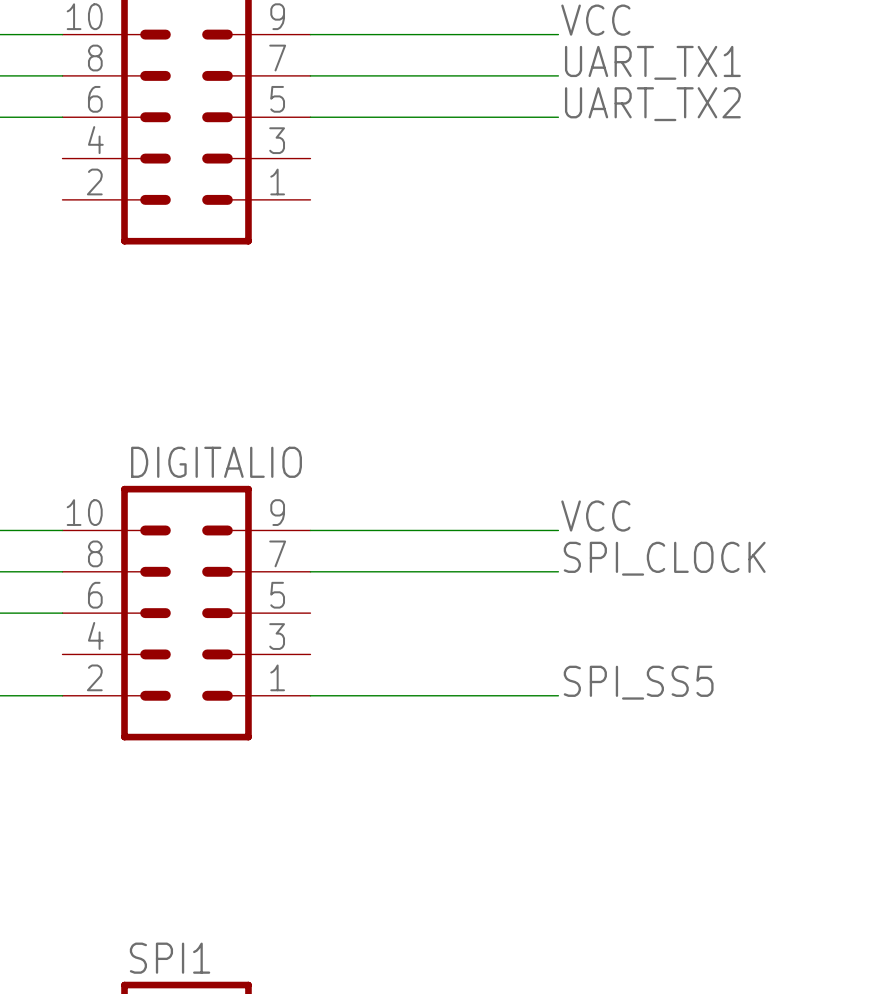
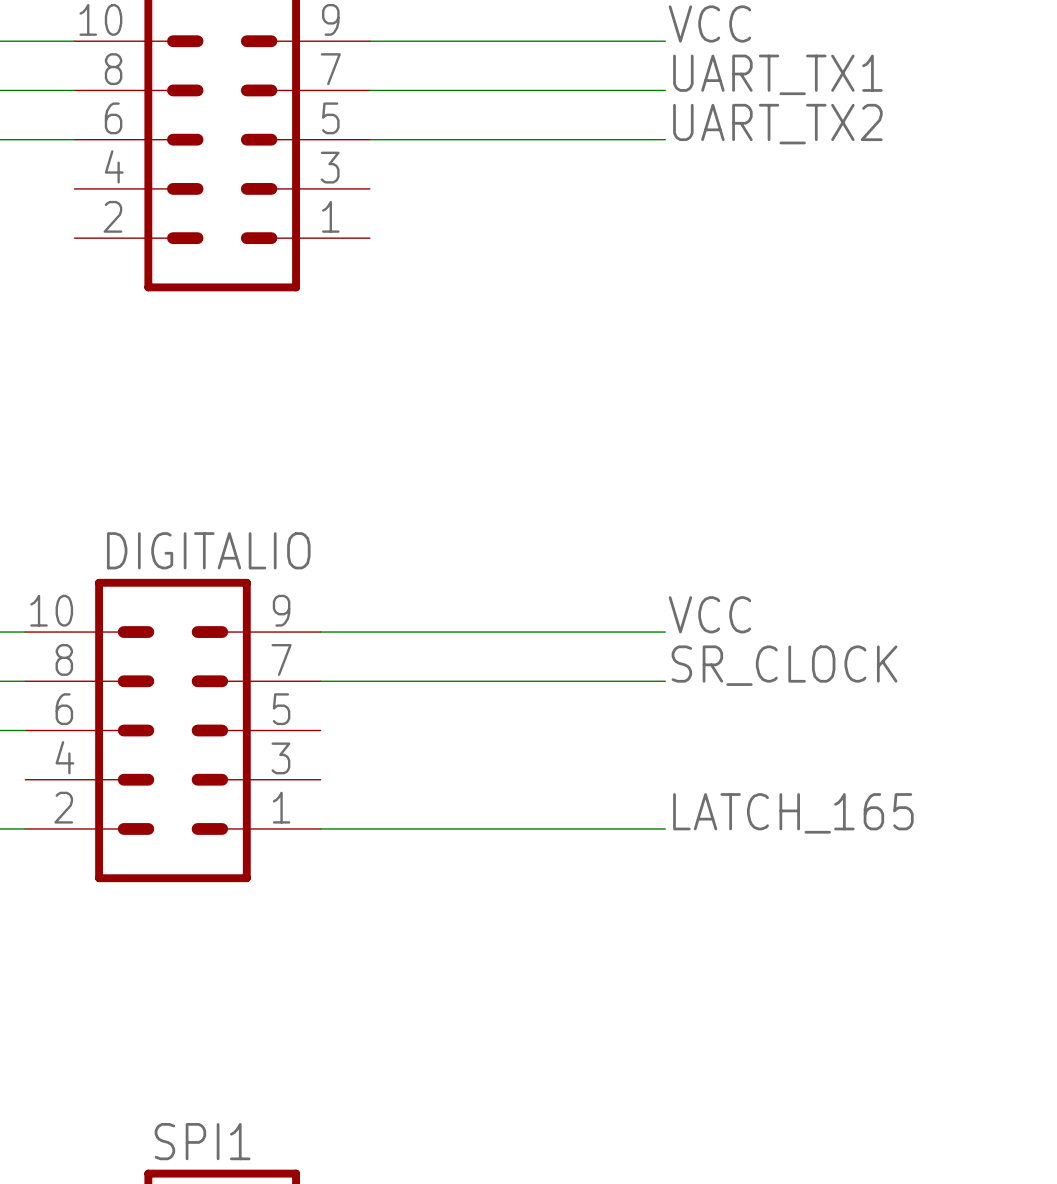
label: SPI_CLOCK (664, 558) -> SR_CLOCK (784, 665)
DIGITALIO position: (186, 613) -> (172, 730)
label: SPI_SS5 (638, 682) -> LATCH_165 (793, 813)

